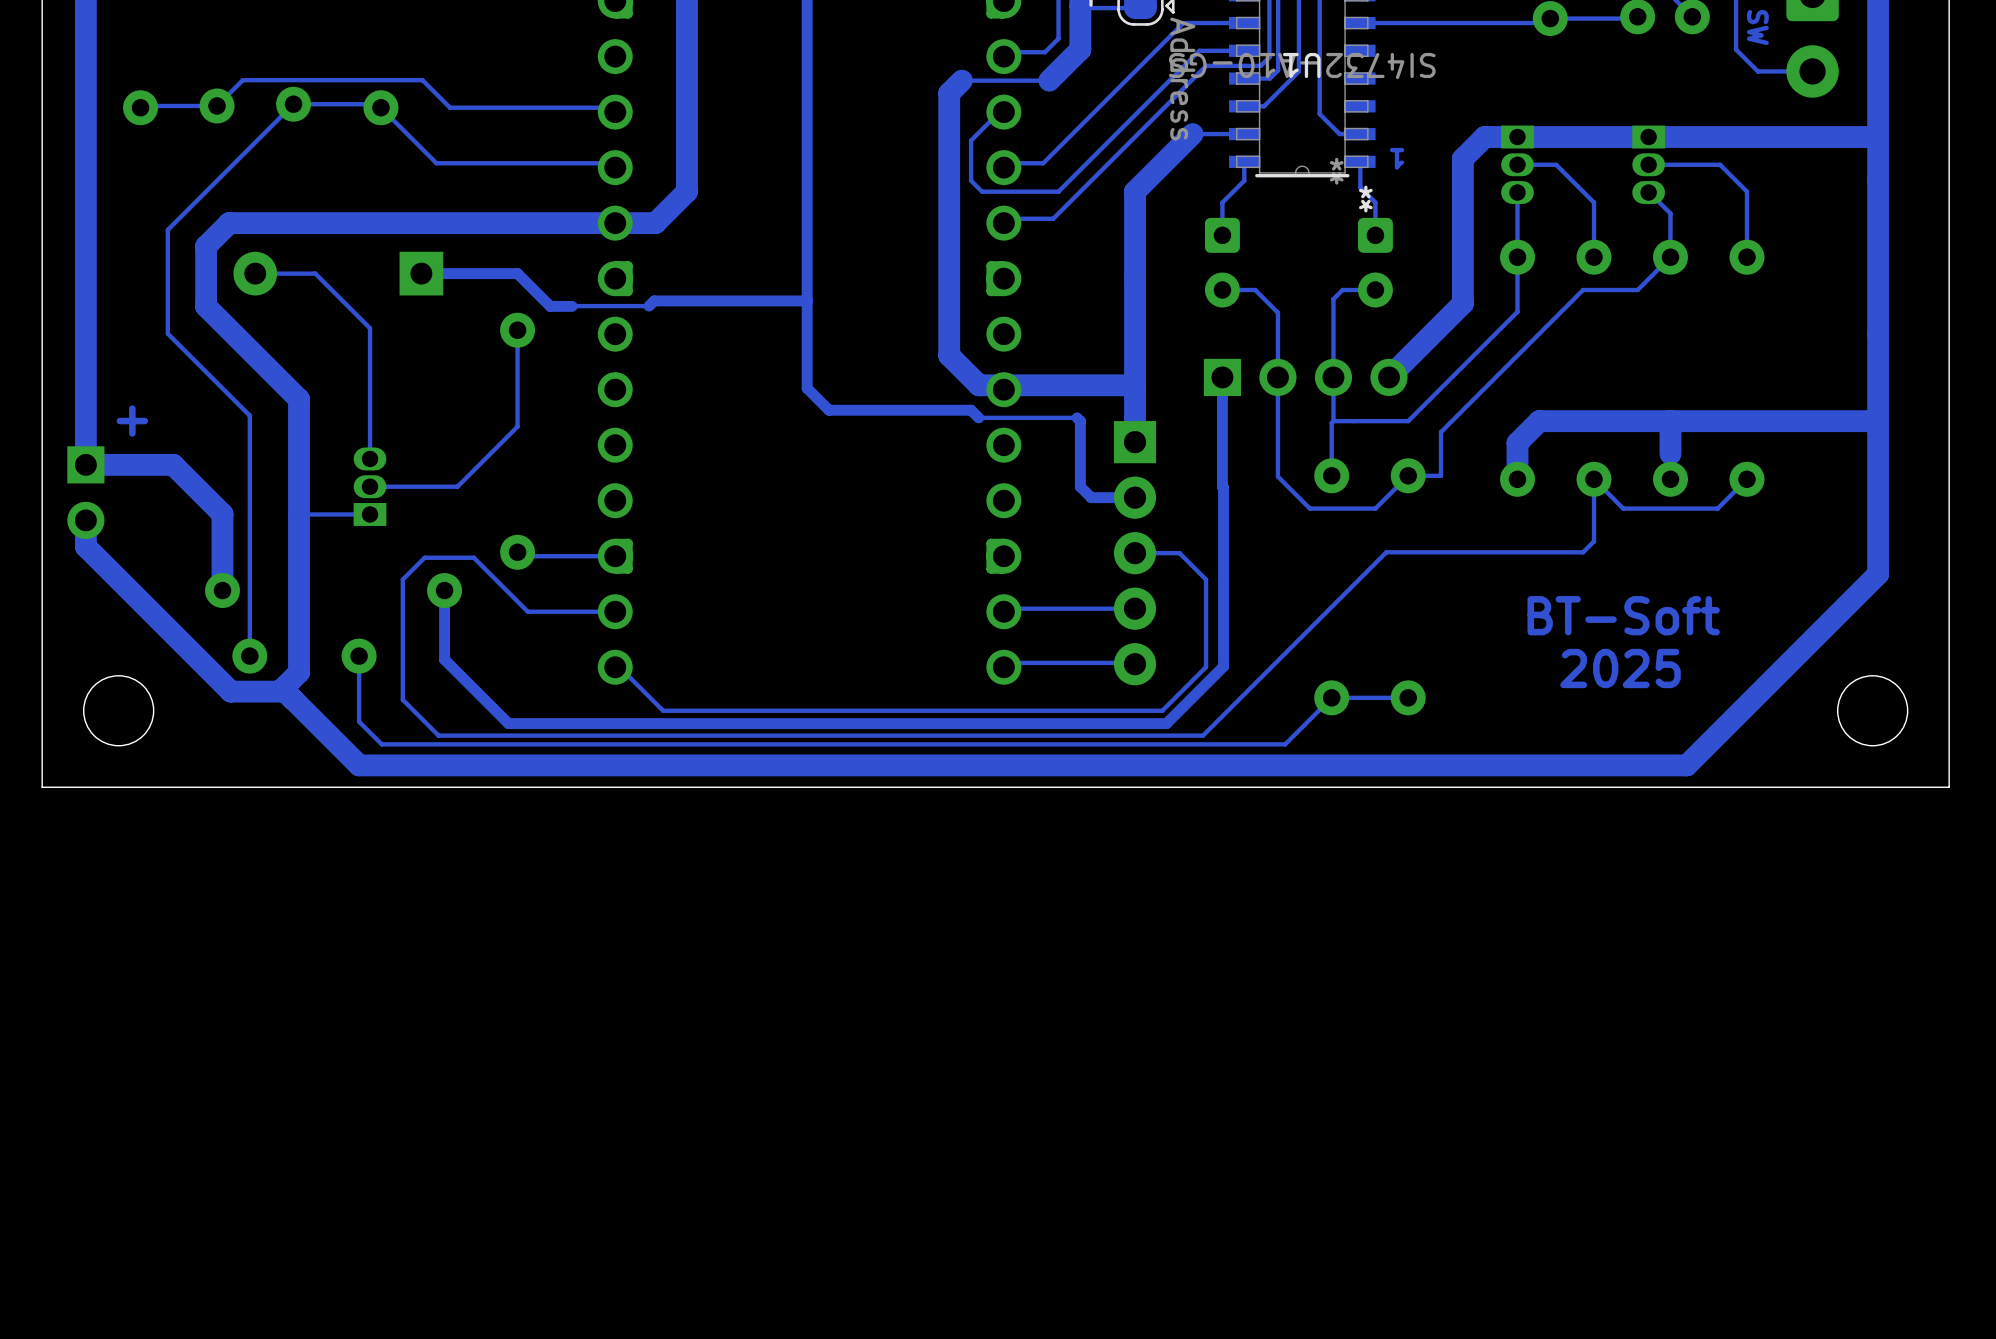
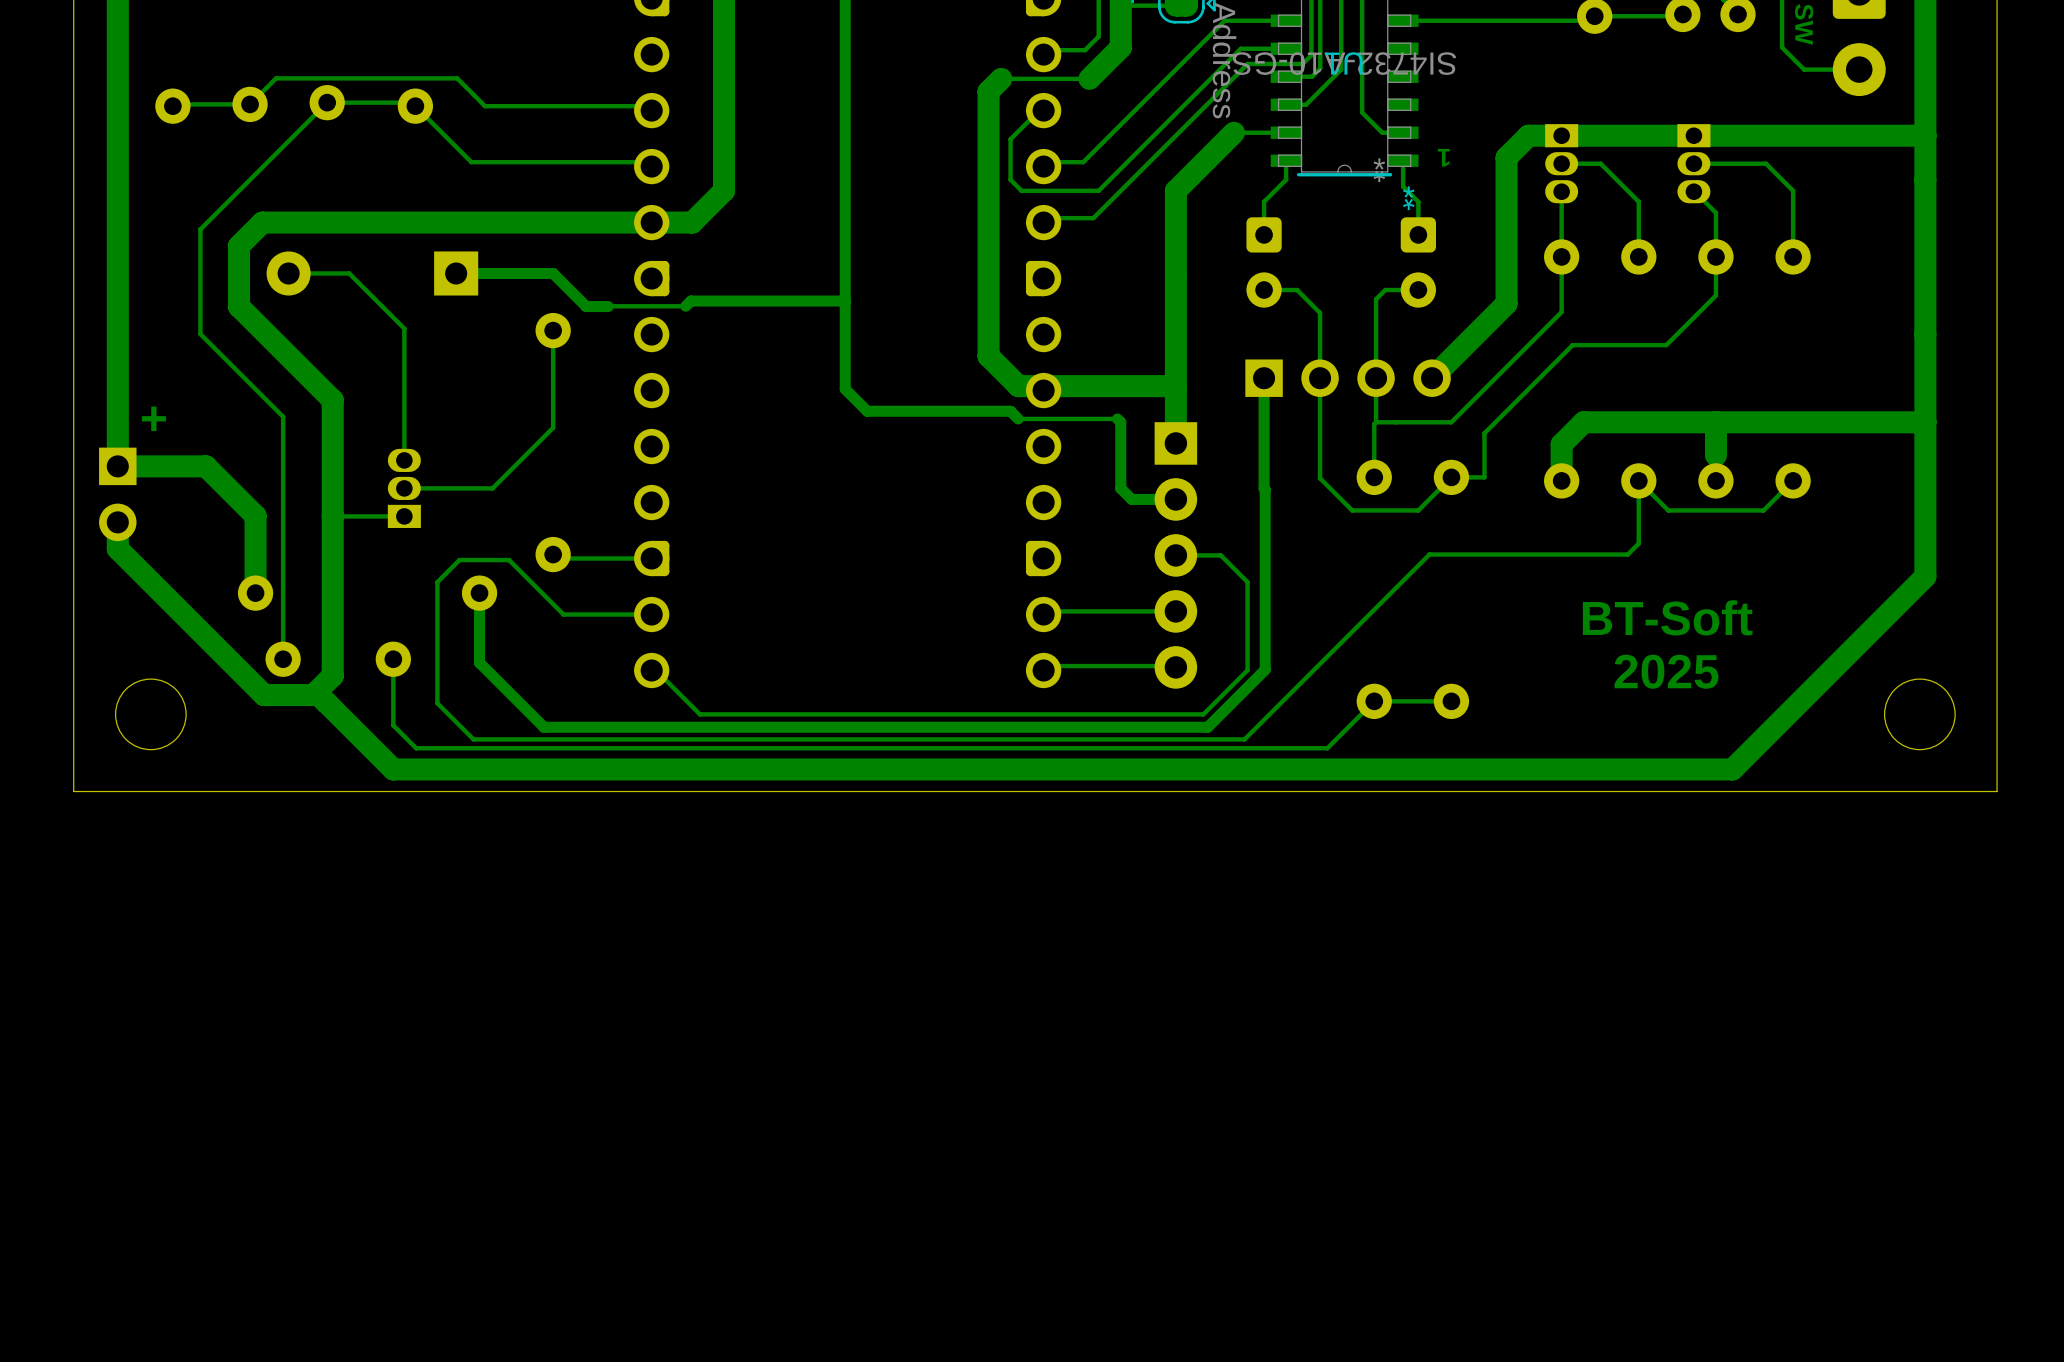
track: (1670, 257) (1637, 290) (1583, 290) (1528, 344) -> (1715, 256) (1715, 295) (1666, 345) (1572, 345)

